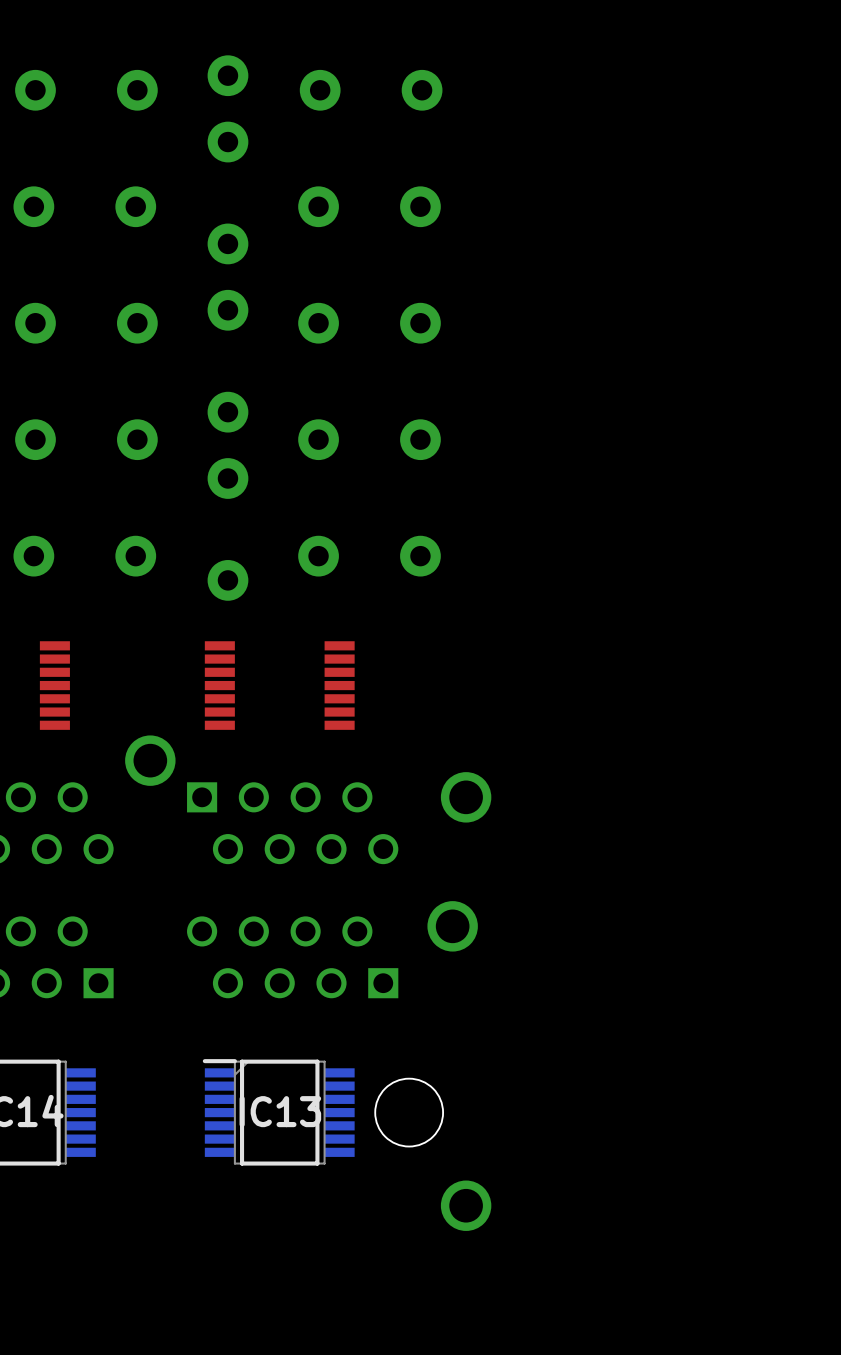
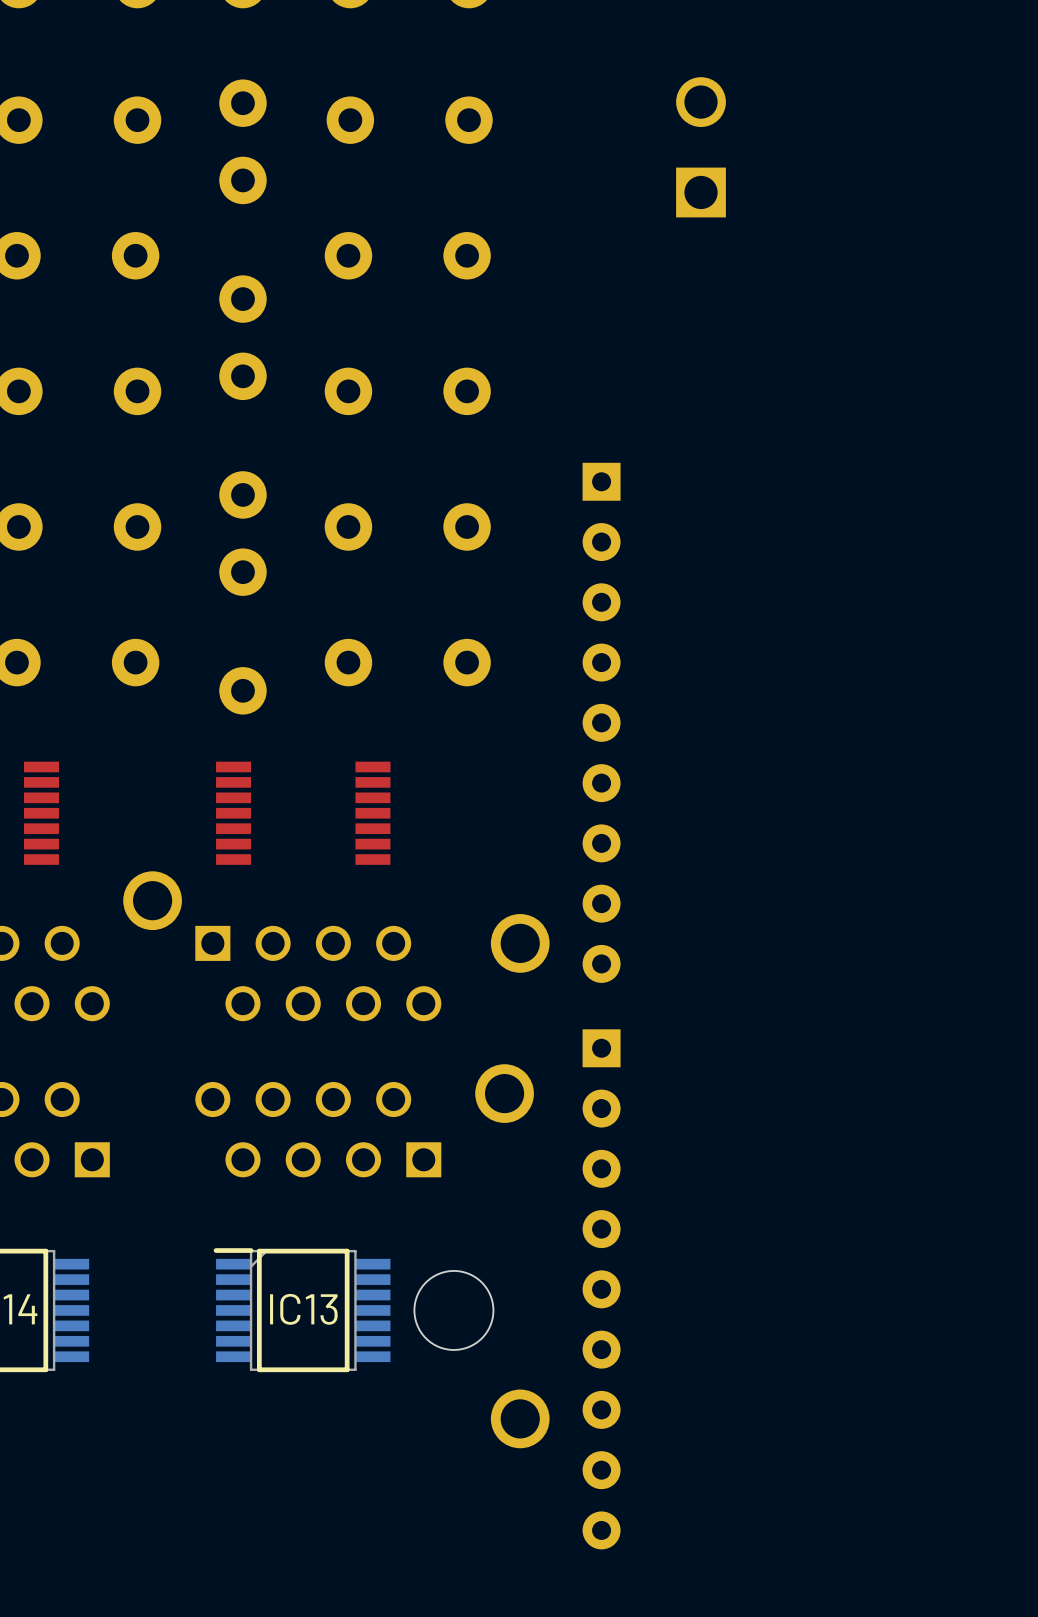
part: none -> (701, 147)
part: none -> (601, 722)
part: none -> (601, 1289)

